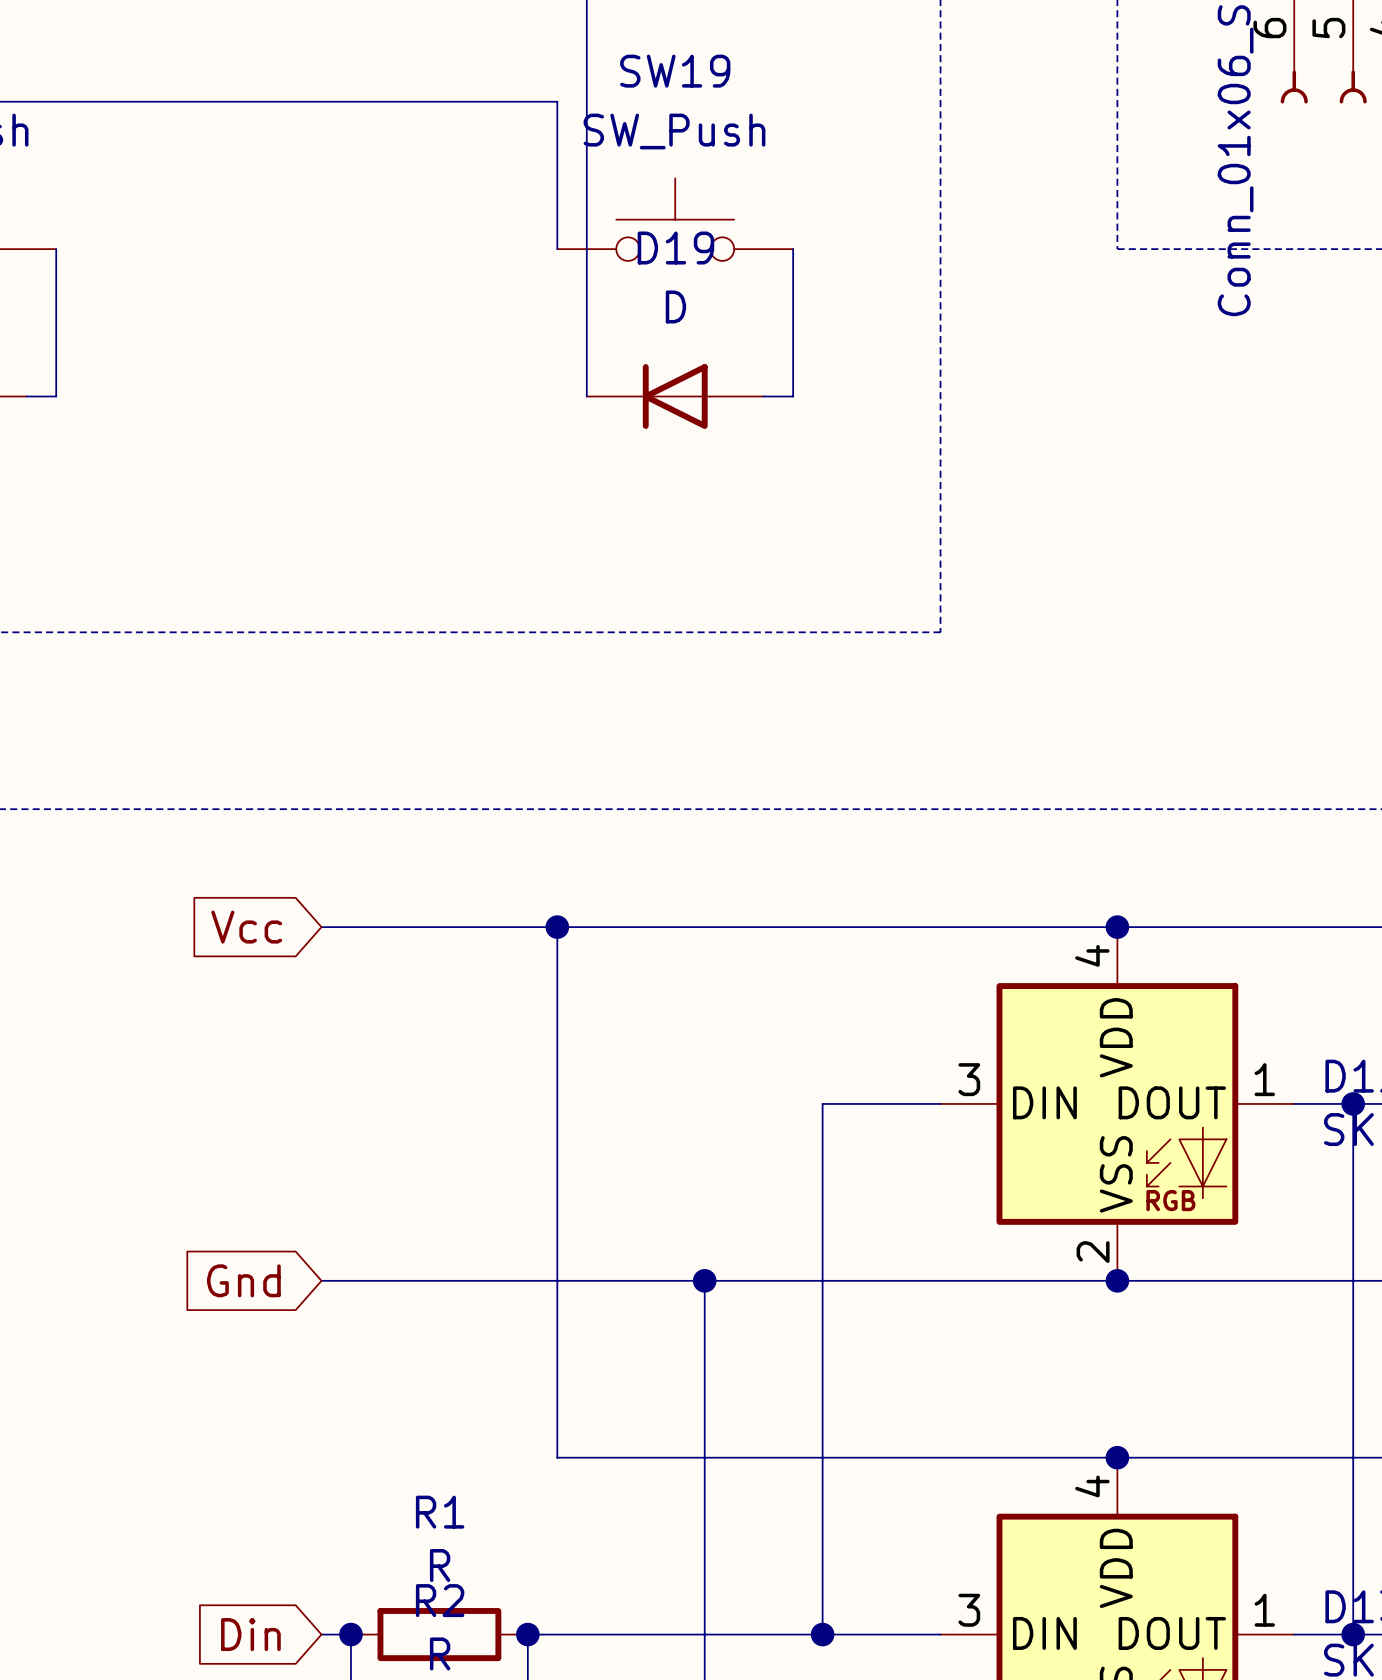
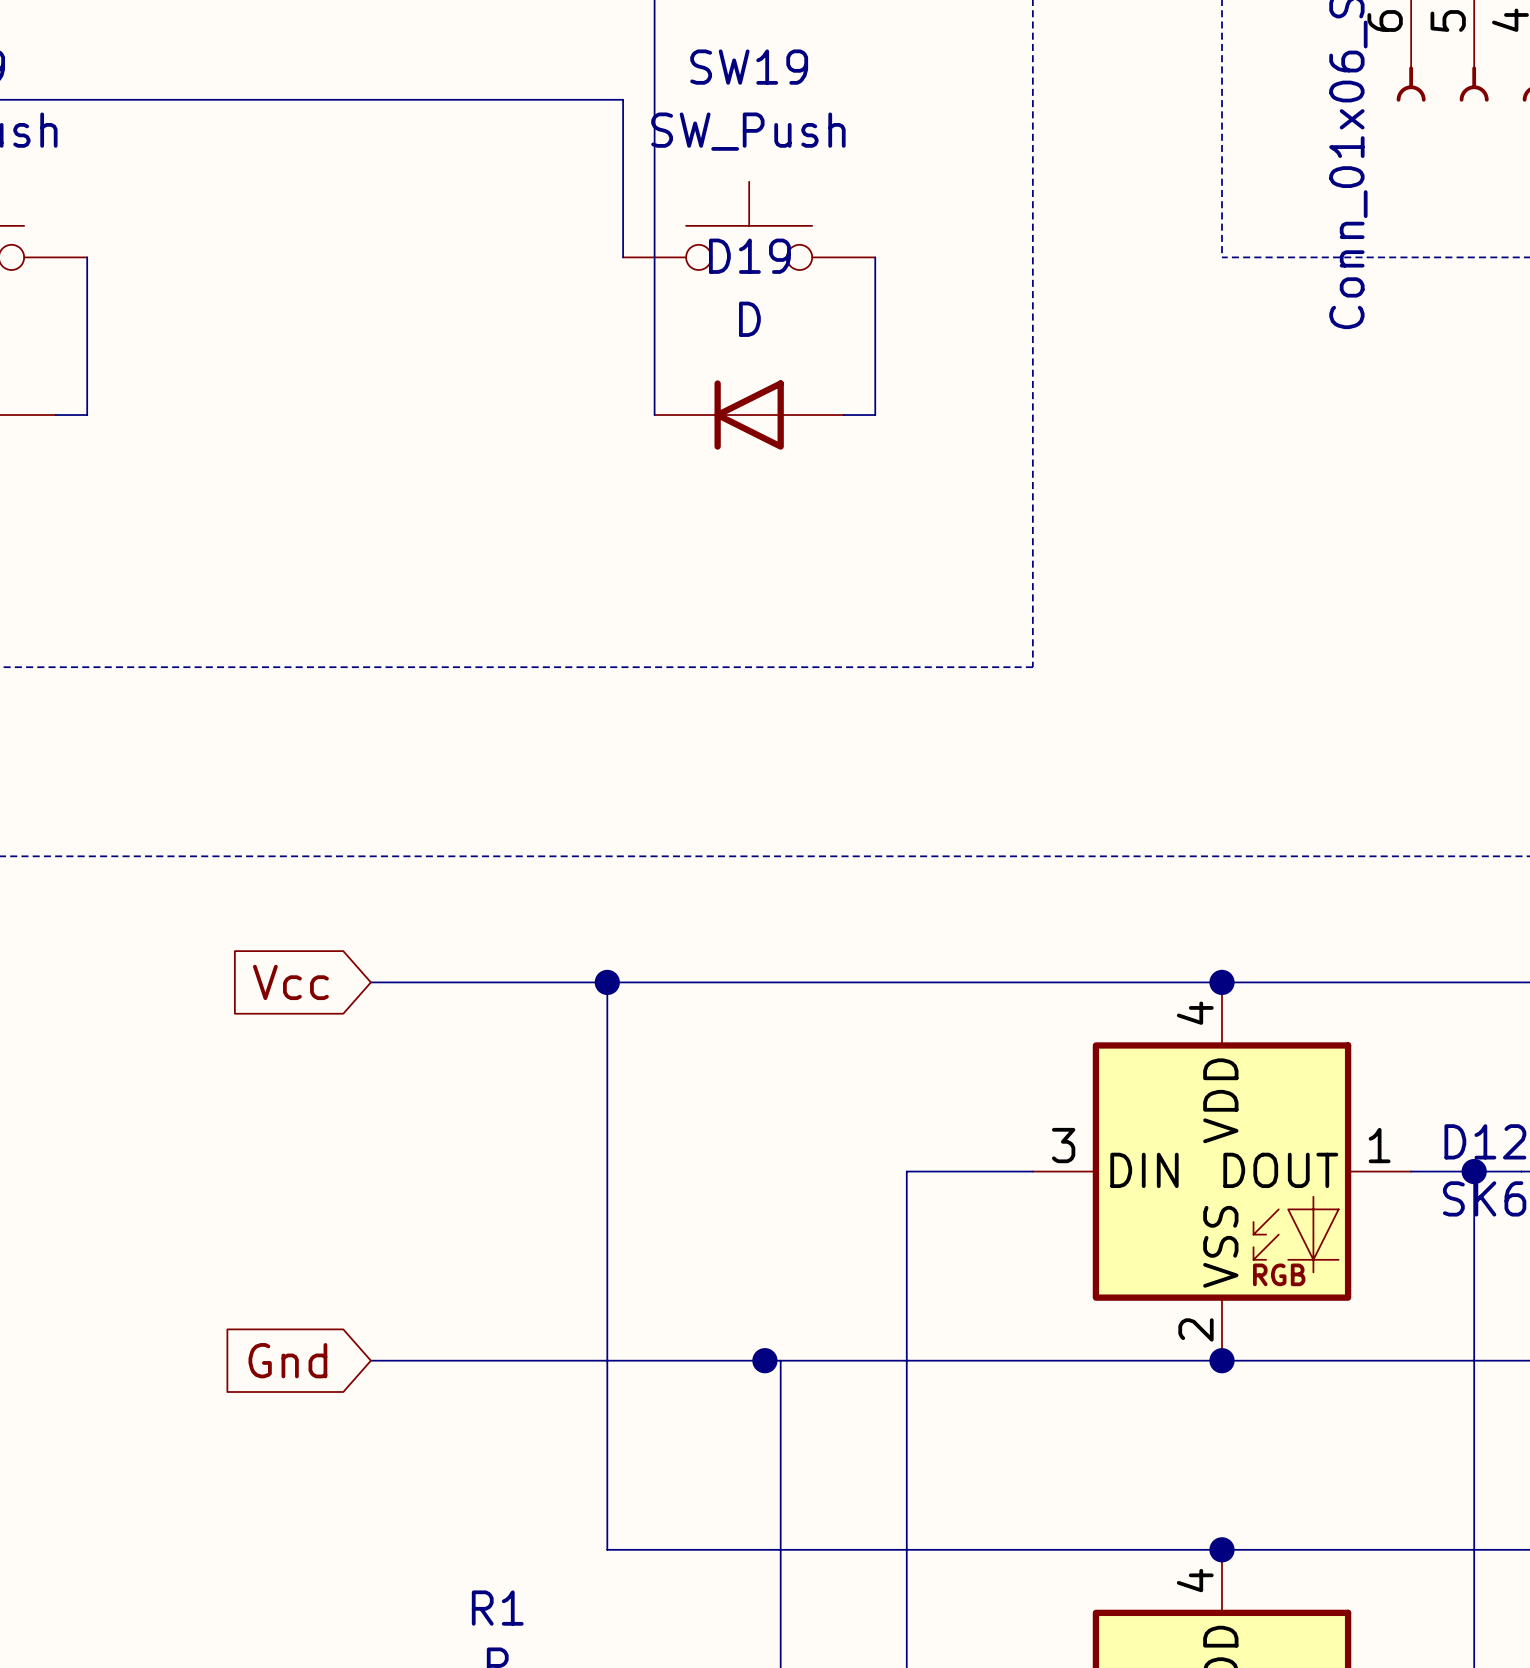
wire: (557, 927) (557, 1457) -> (607, 982) (607, 1549) (623, 1549)
junction position: (557, 927) -> (607, 982)
junction position: (704, 1280) -> (764, 1360)

